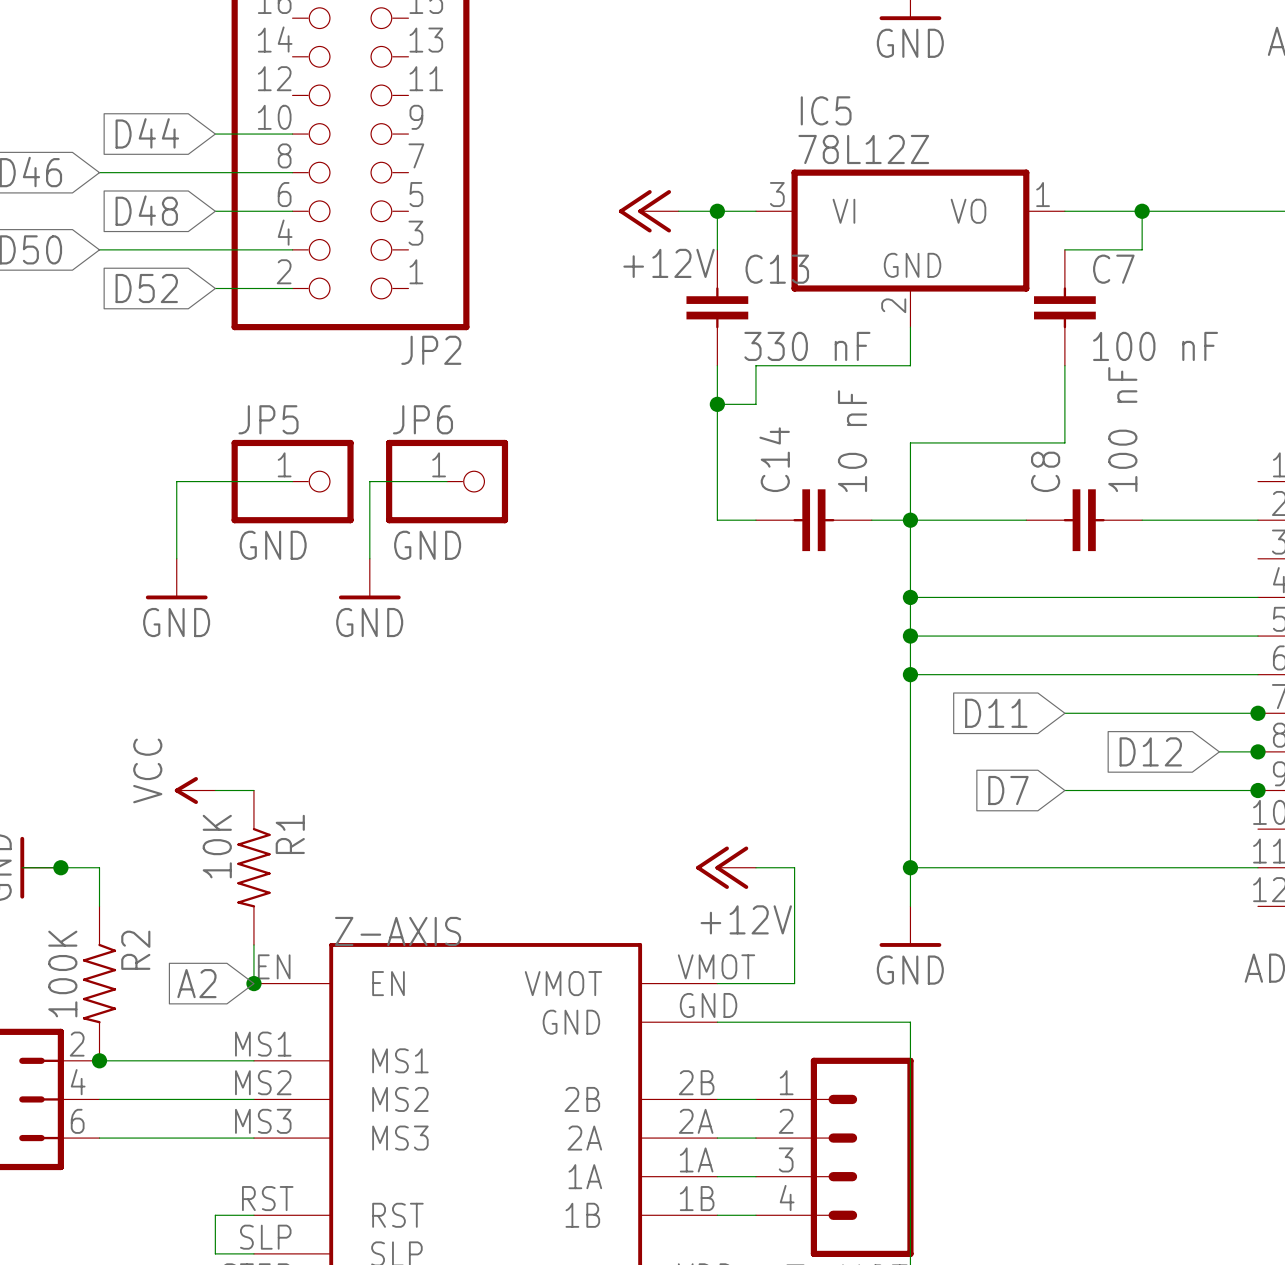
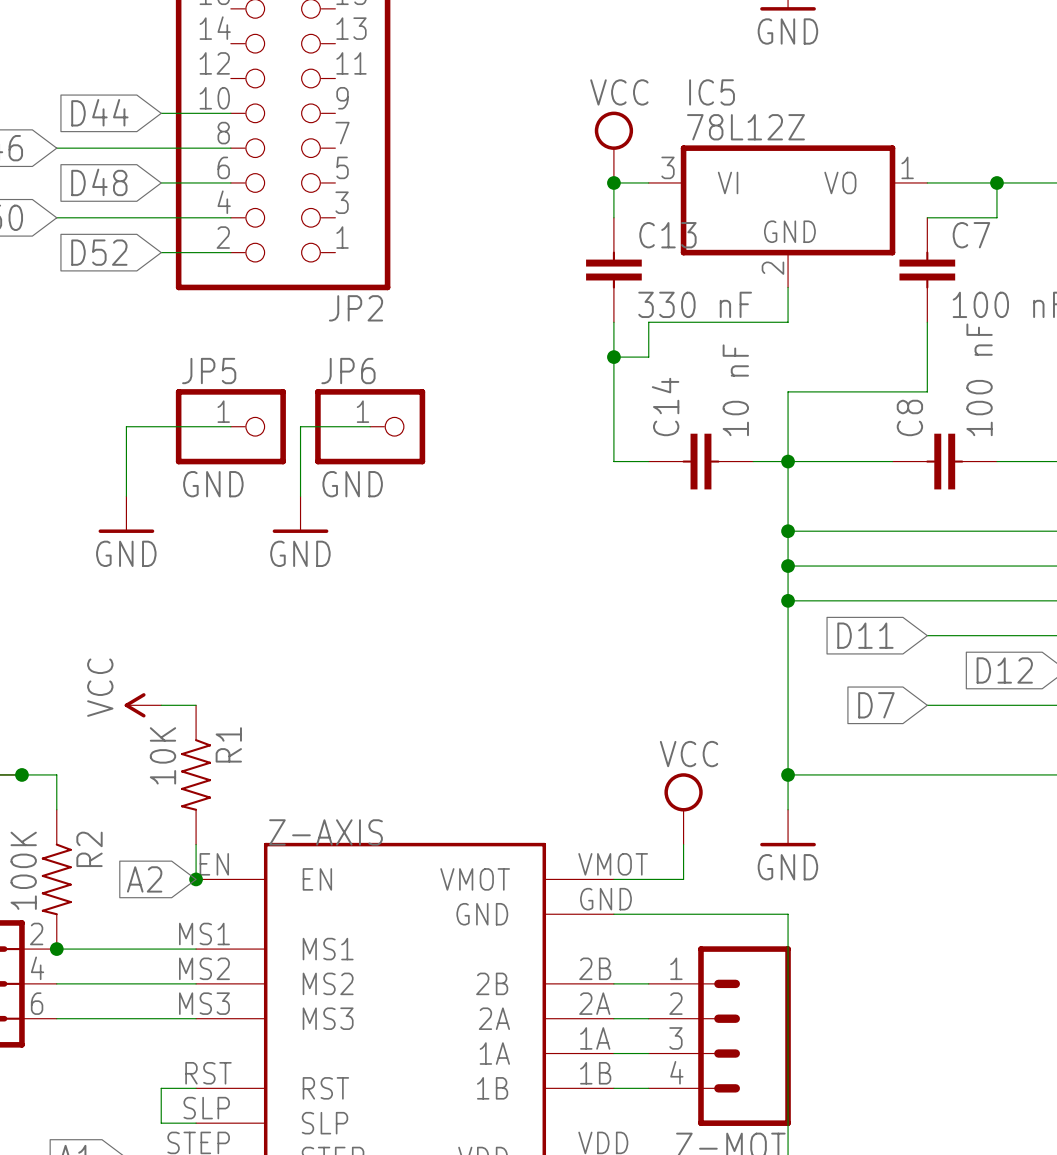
power symbol: none -> VCC (613, 147)
power symbol: +12V (648, 211) -> none
wire: (678, 211) (717, 211) -> none
power symbol: +12V (726, 867) -> none
wire: (755, 867) (794, 867) (794, 944) -> none
power symbol: none -> VCC (683, 808)

